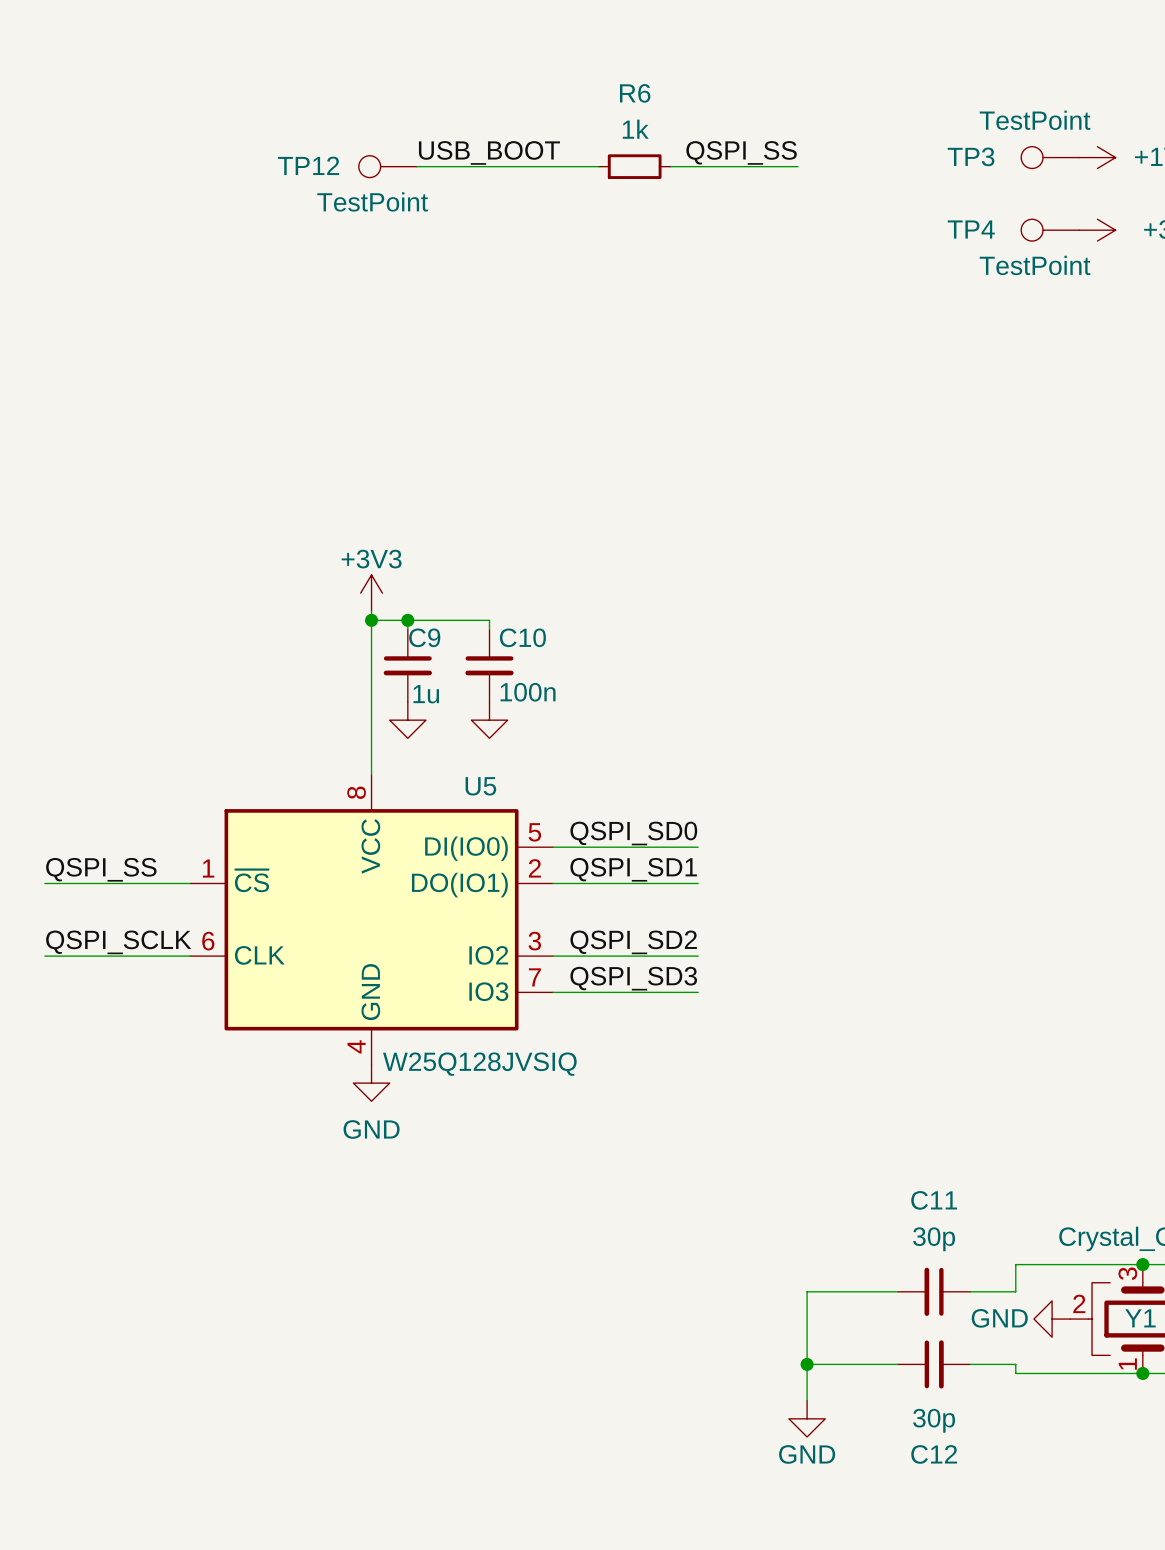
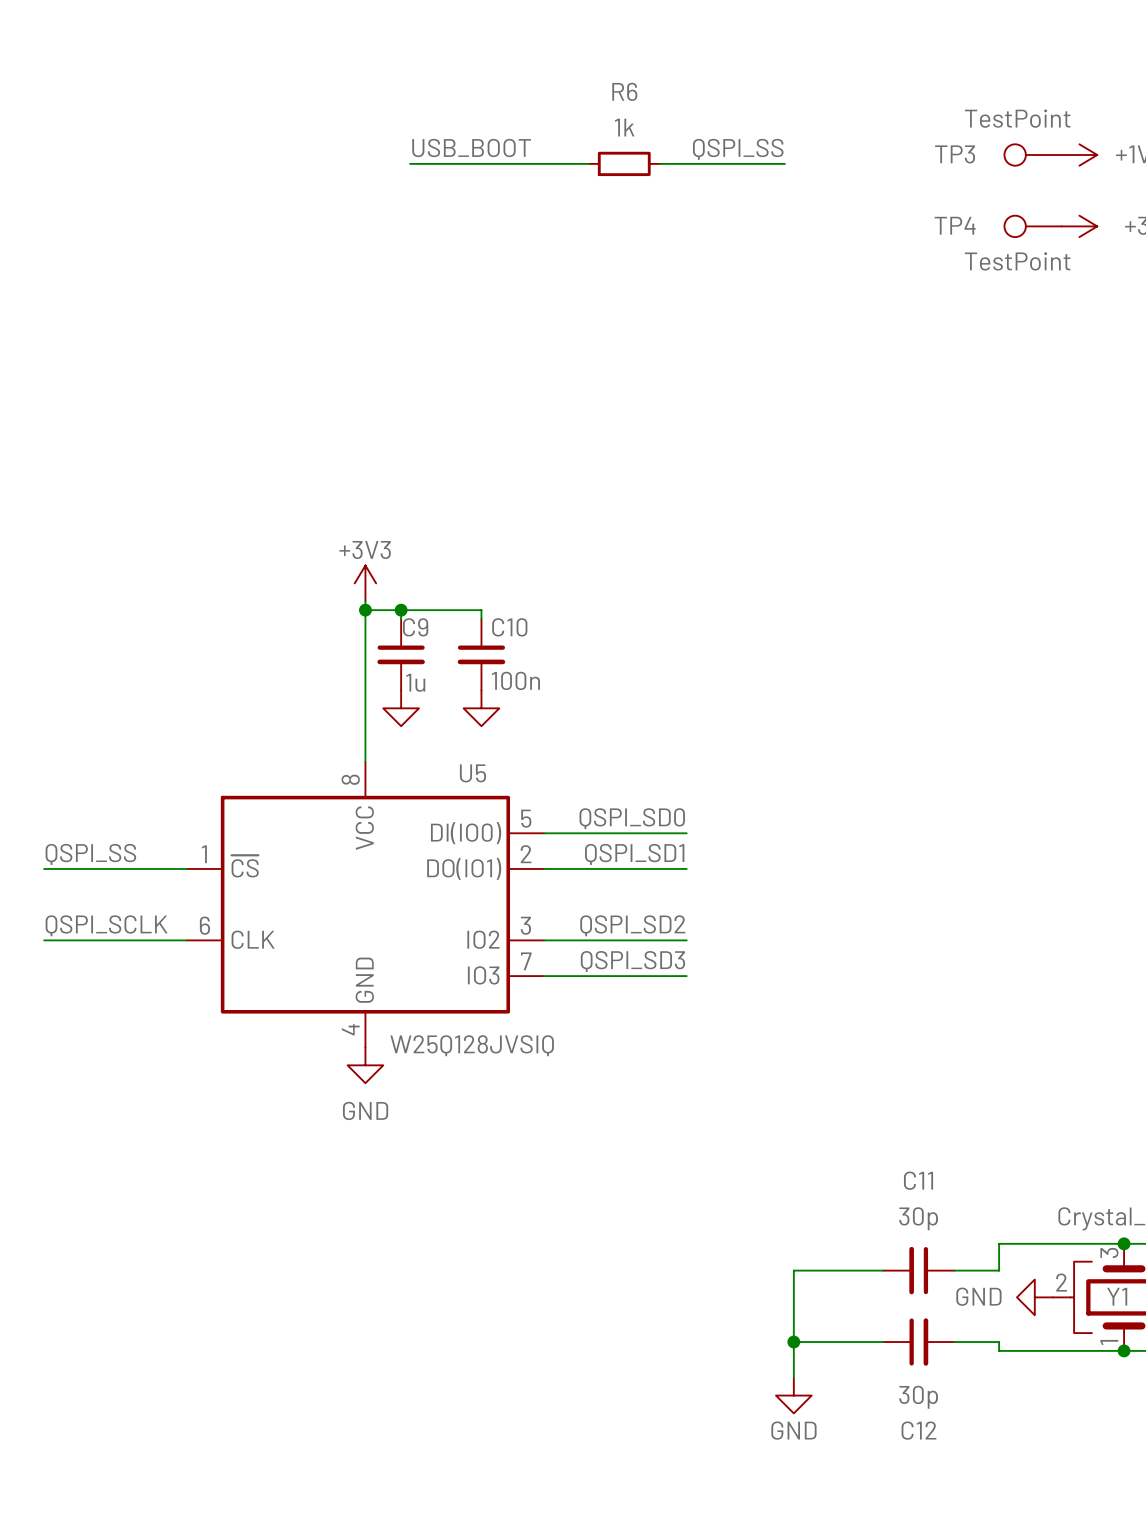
TP12: TestPoint (387, 166) -> none

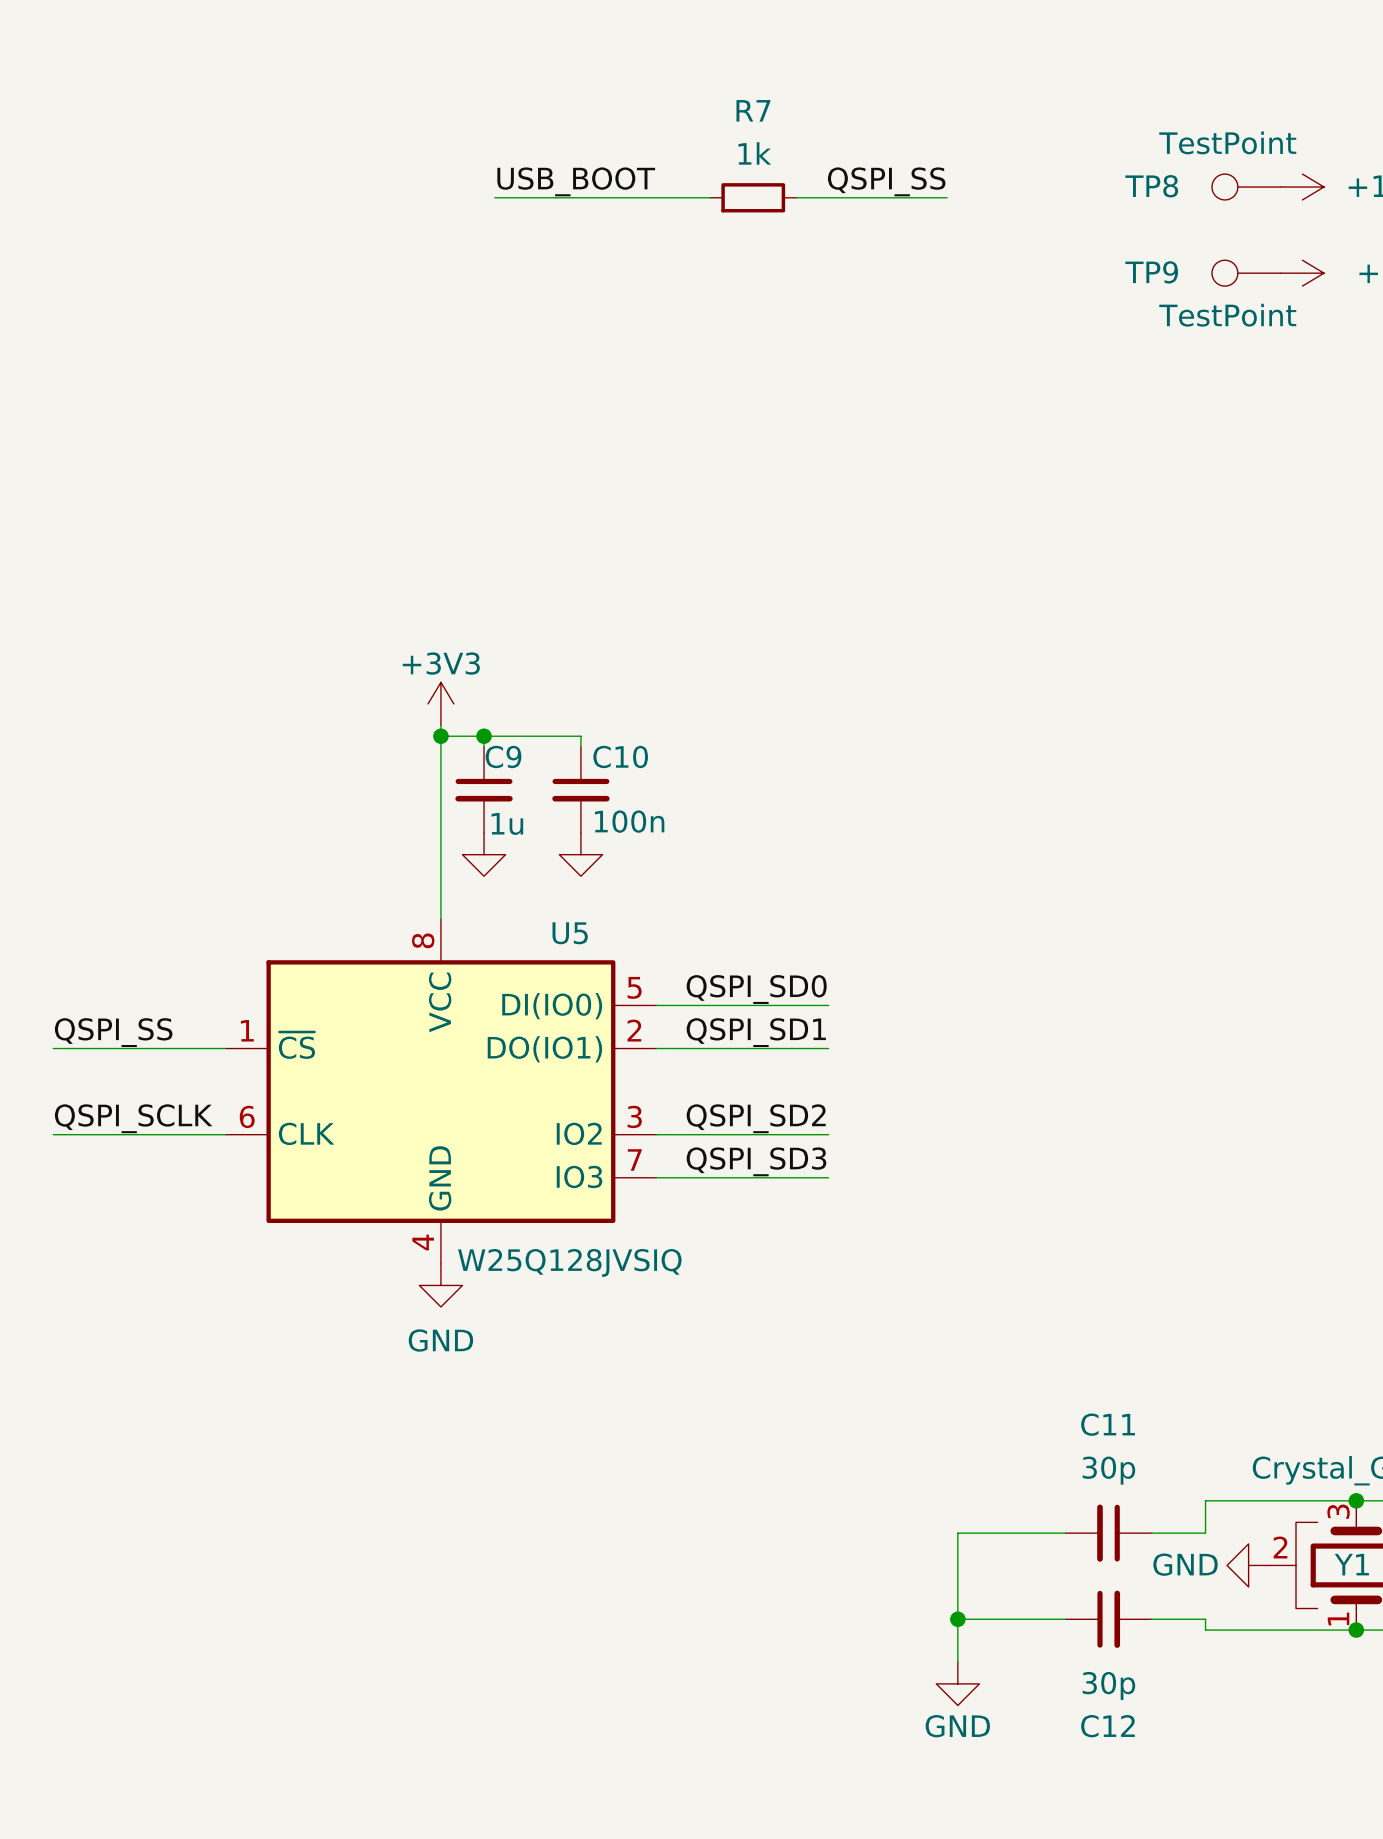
R6 name: R6 (624, 91) -> R7 (753, 110)
TP3 name: TP3 (955, 154) -> TP8 (1151, 186)
TP4 name: TP4 (955, 225) -> TP9 (1151, 272)

